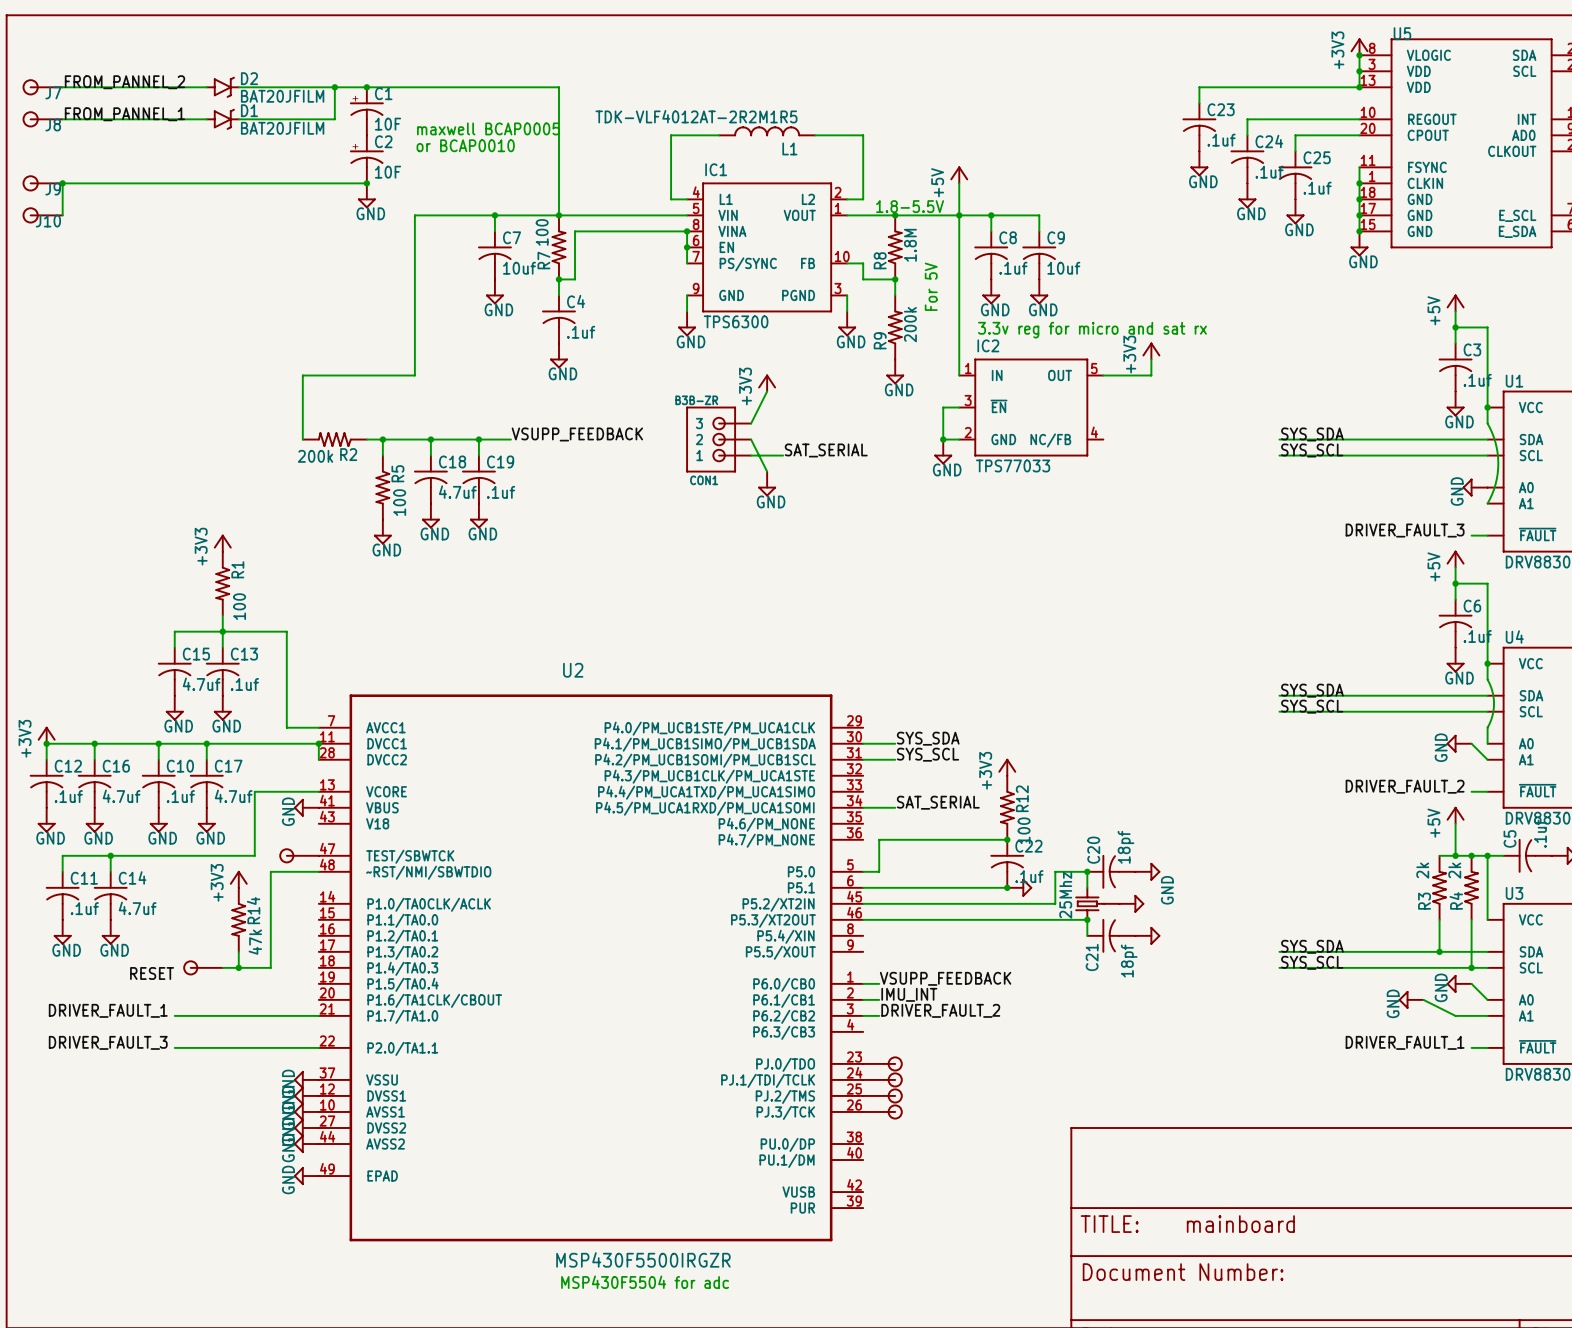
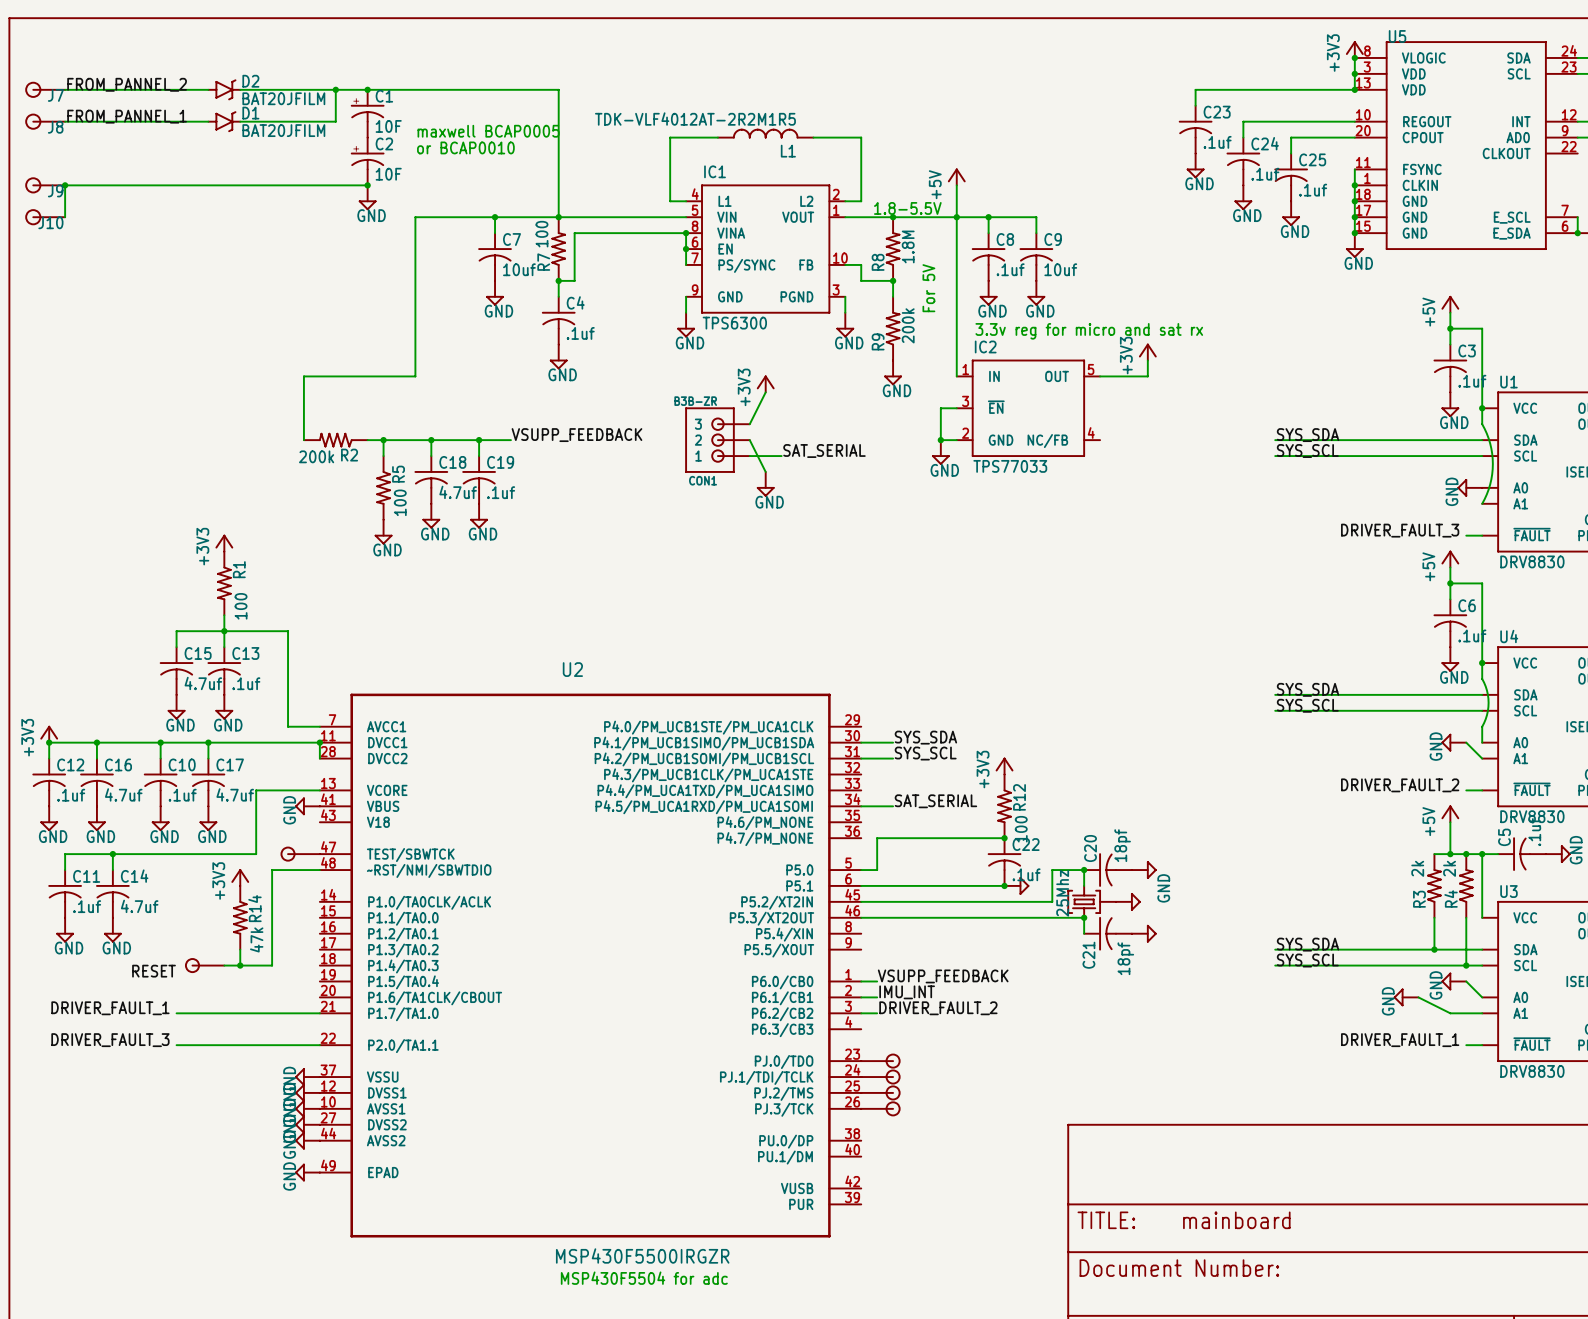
part symbol: [1075, 887, 1120, 921] -> [1067, 885, 1116, 919]

